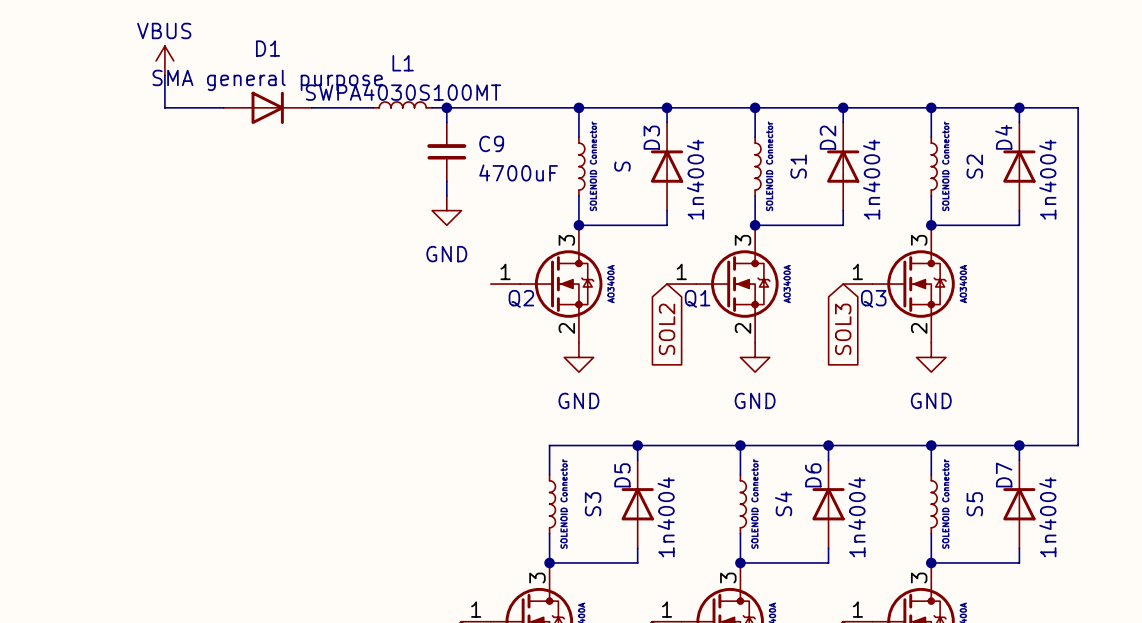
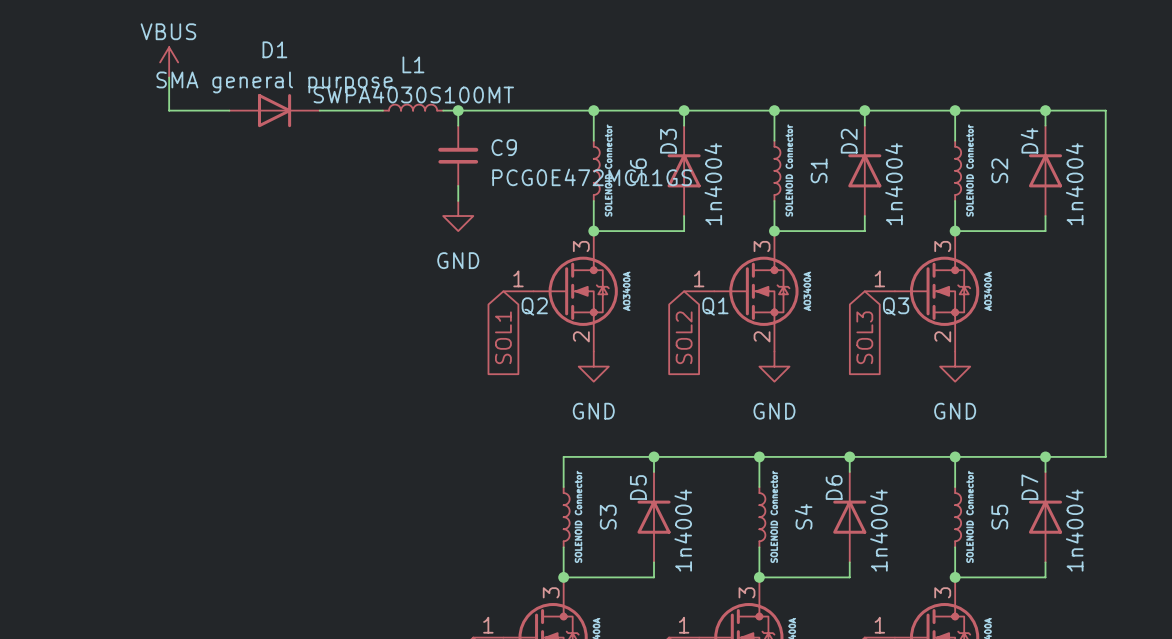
S name: S (622, 166) -> S6 (638, 170)
C9 value: 4700uF (518, 172) -> PCG0E472MCL1GS (592, 177)
global label: none -> SOL1 (503, 337)

